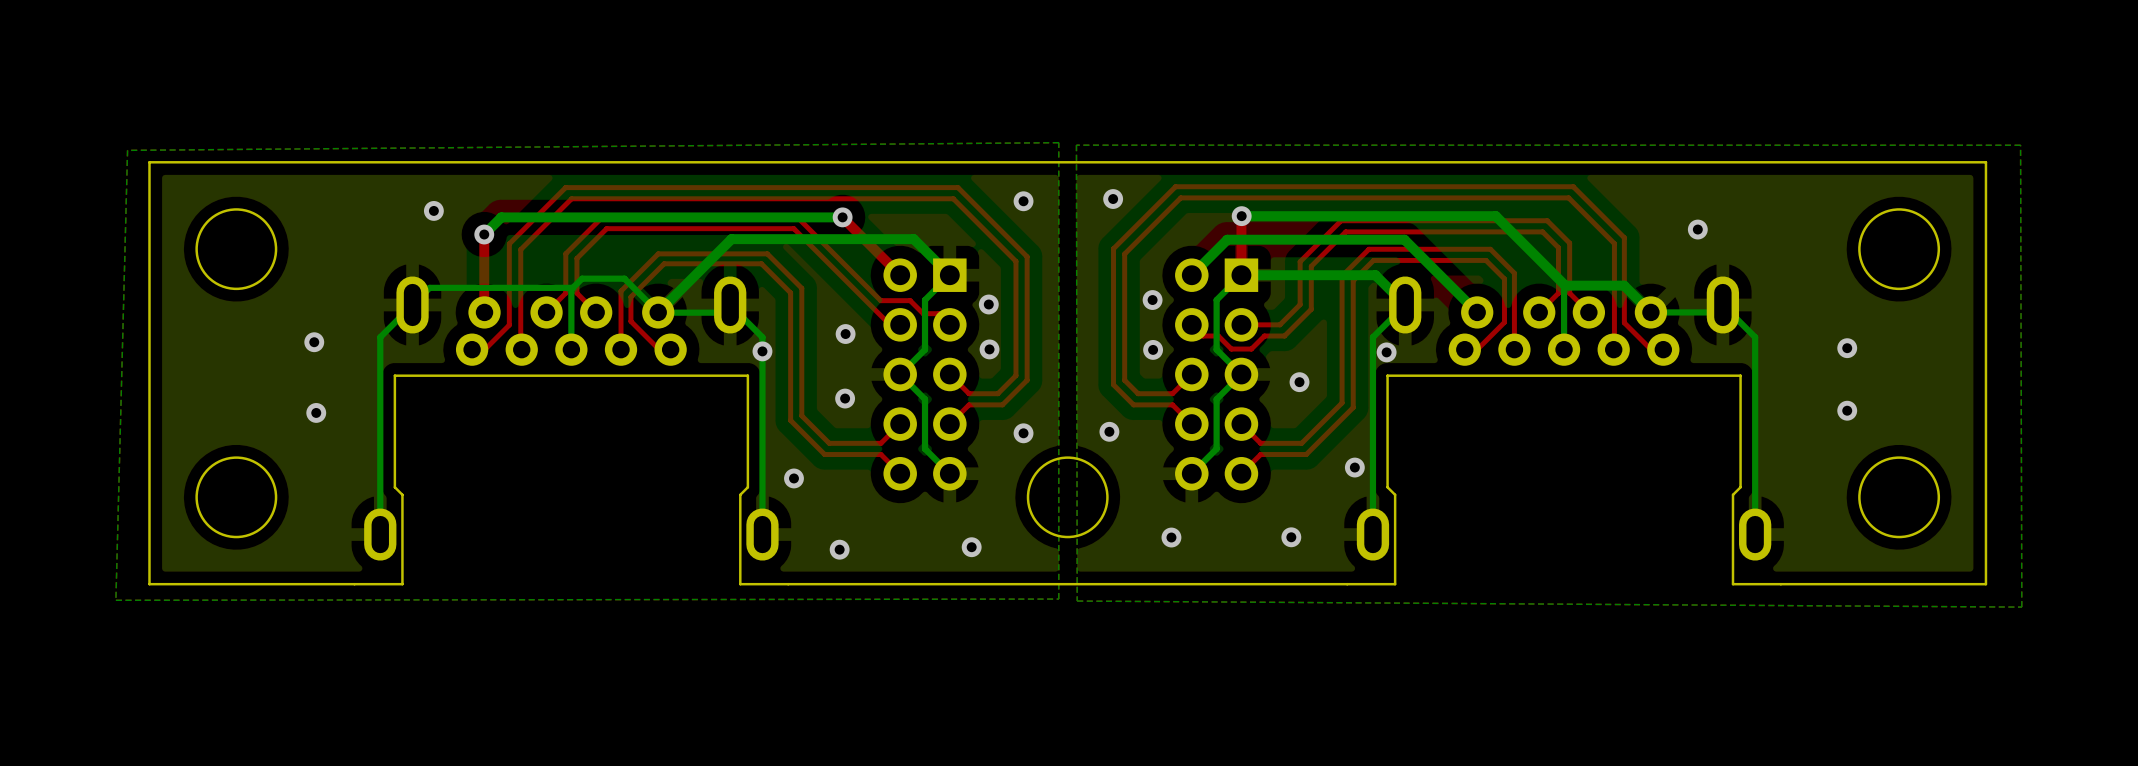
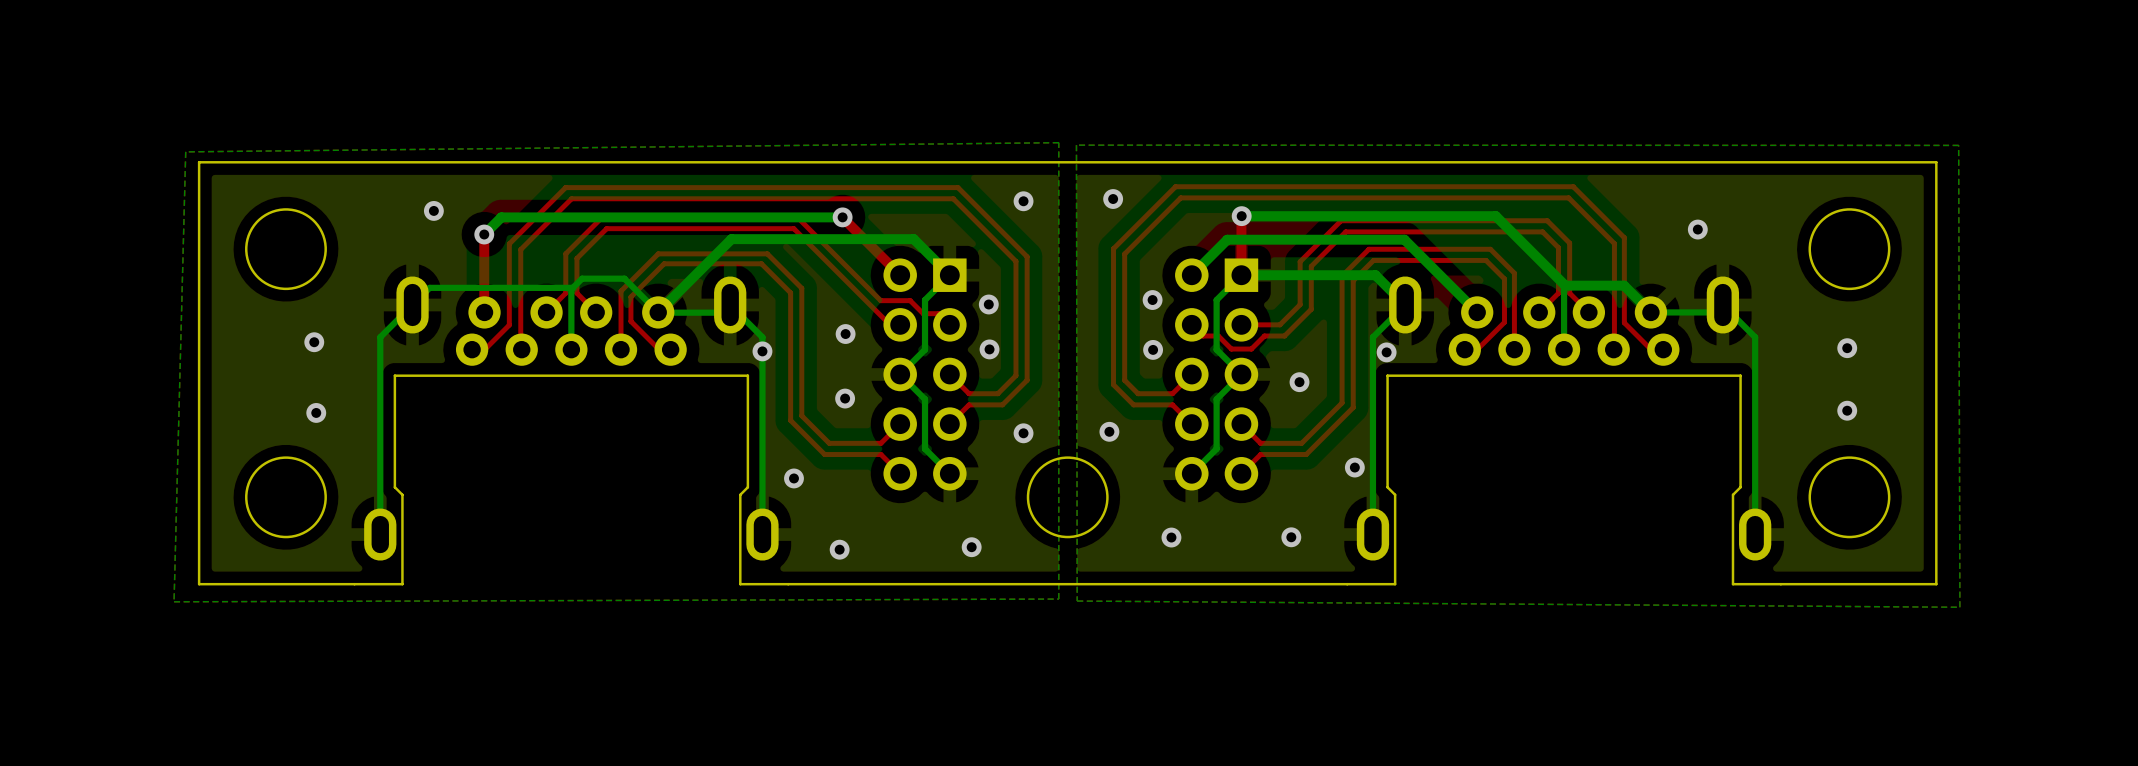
bottom zone outline: (1058, 142) (127, 150) (115, 600) (1058, 599) -> (1058, 142) (185, 151) (174, 601) (1058, 599)
bottom zone outline: (1076, 145) (2020, 145) (2021, 607) (1077, 601) -> (1076, 145) (1958, 145) (1959, 607) (1077, 601)
board edge: (199, 162) (149, 162) (149, 584) (199, 584) -> (199, 162) (199, 584)
board edge: (1936, 162) (1985, 162) (1985, 584) (1936, 584) -> (1936, 162) (1936, 584)
round board edge position: (236, 249) -> (285, 249)
round board edge position: (1899, 249) -> (1849, 249)
round board edge position: (236, 497) -> (285, 497)
round board edge position: (1899, 497) -> (1849, 497)

